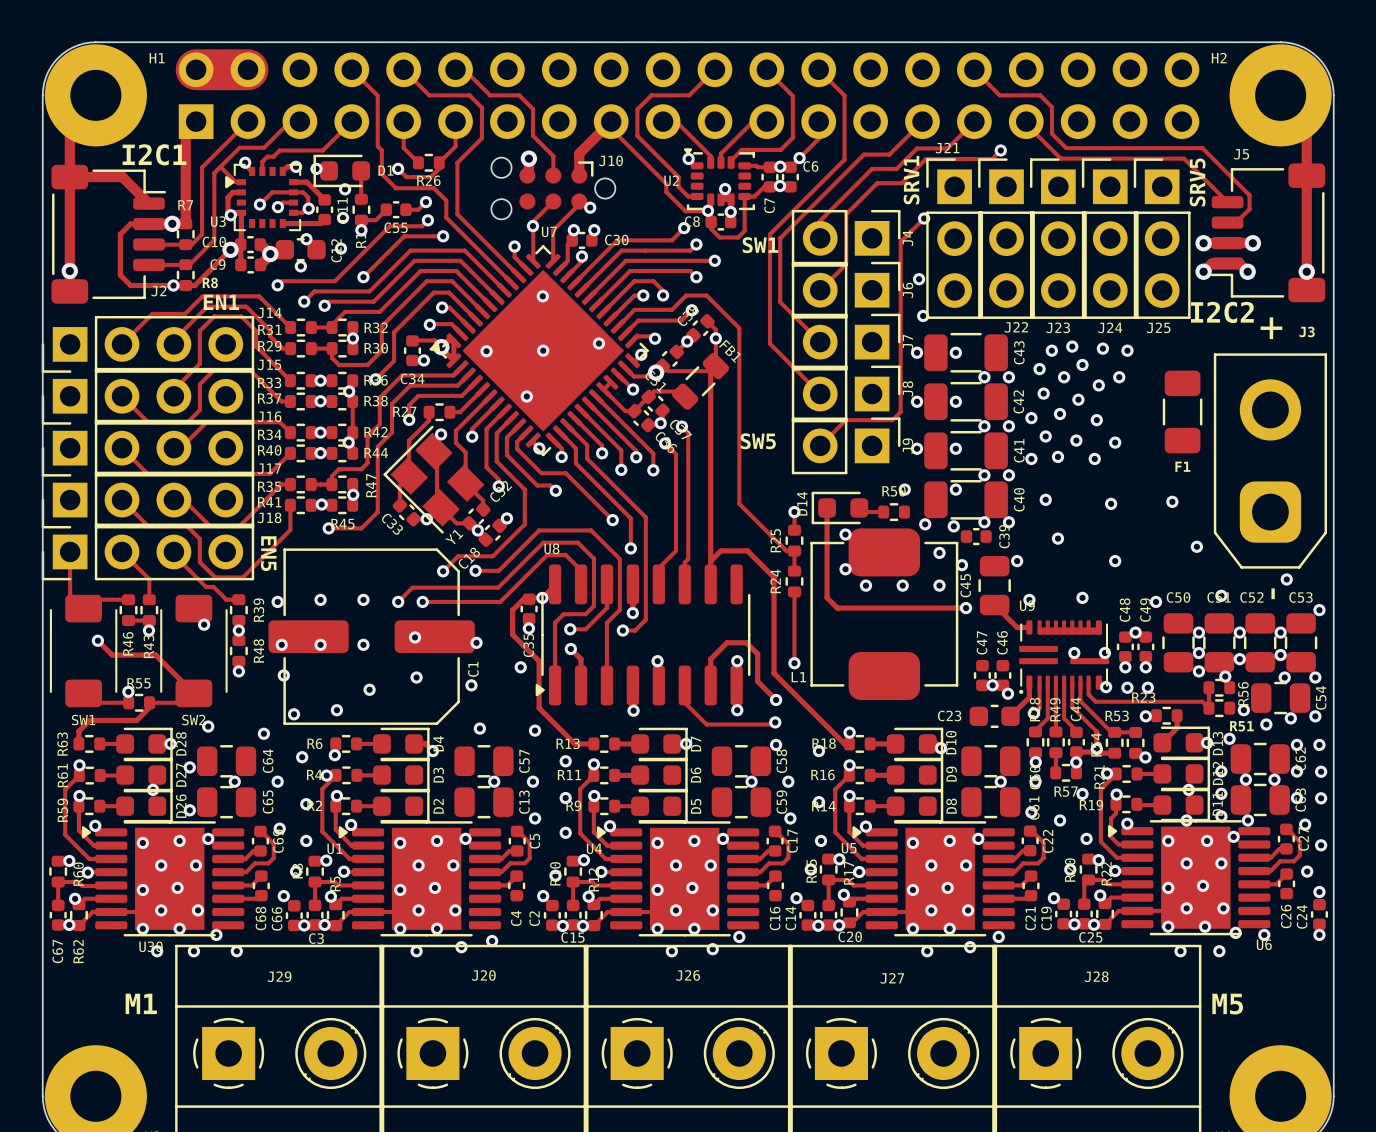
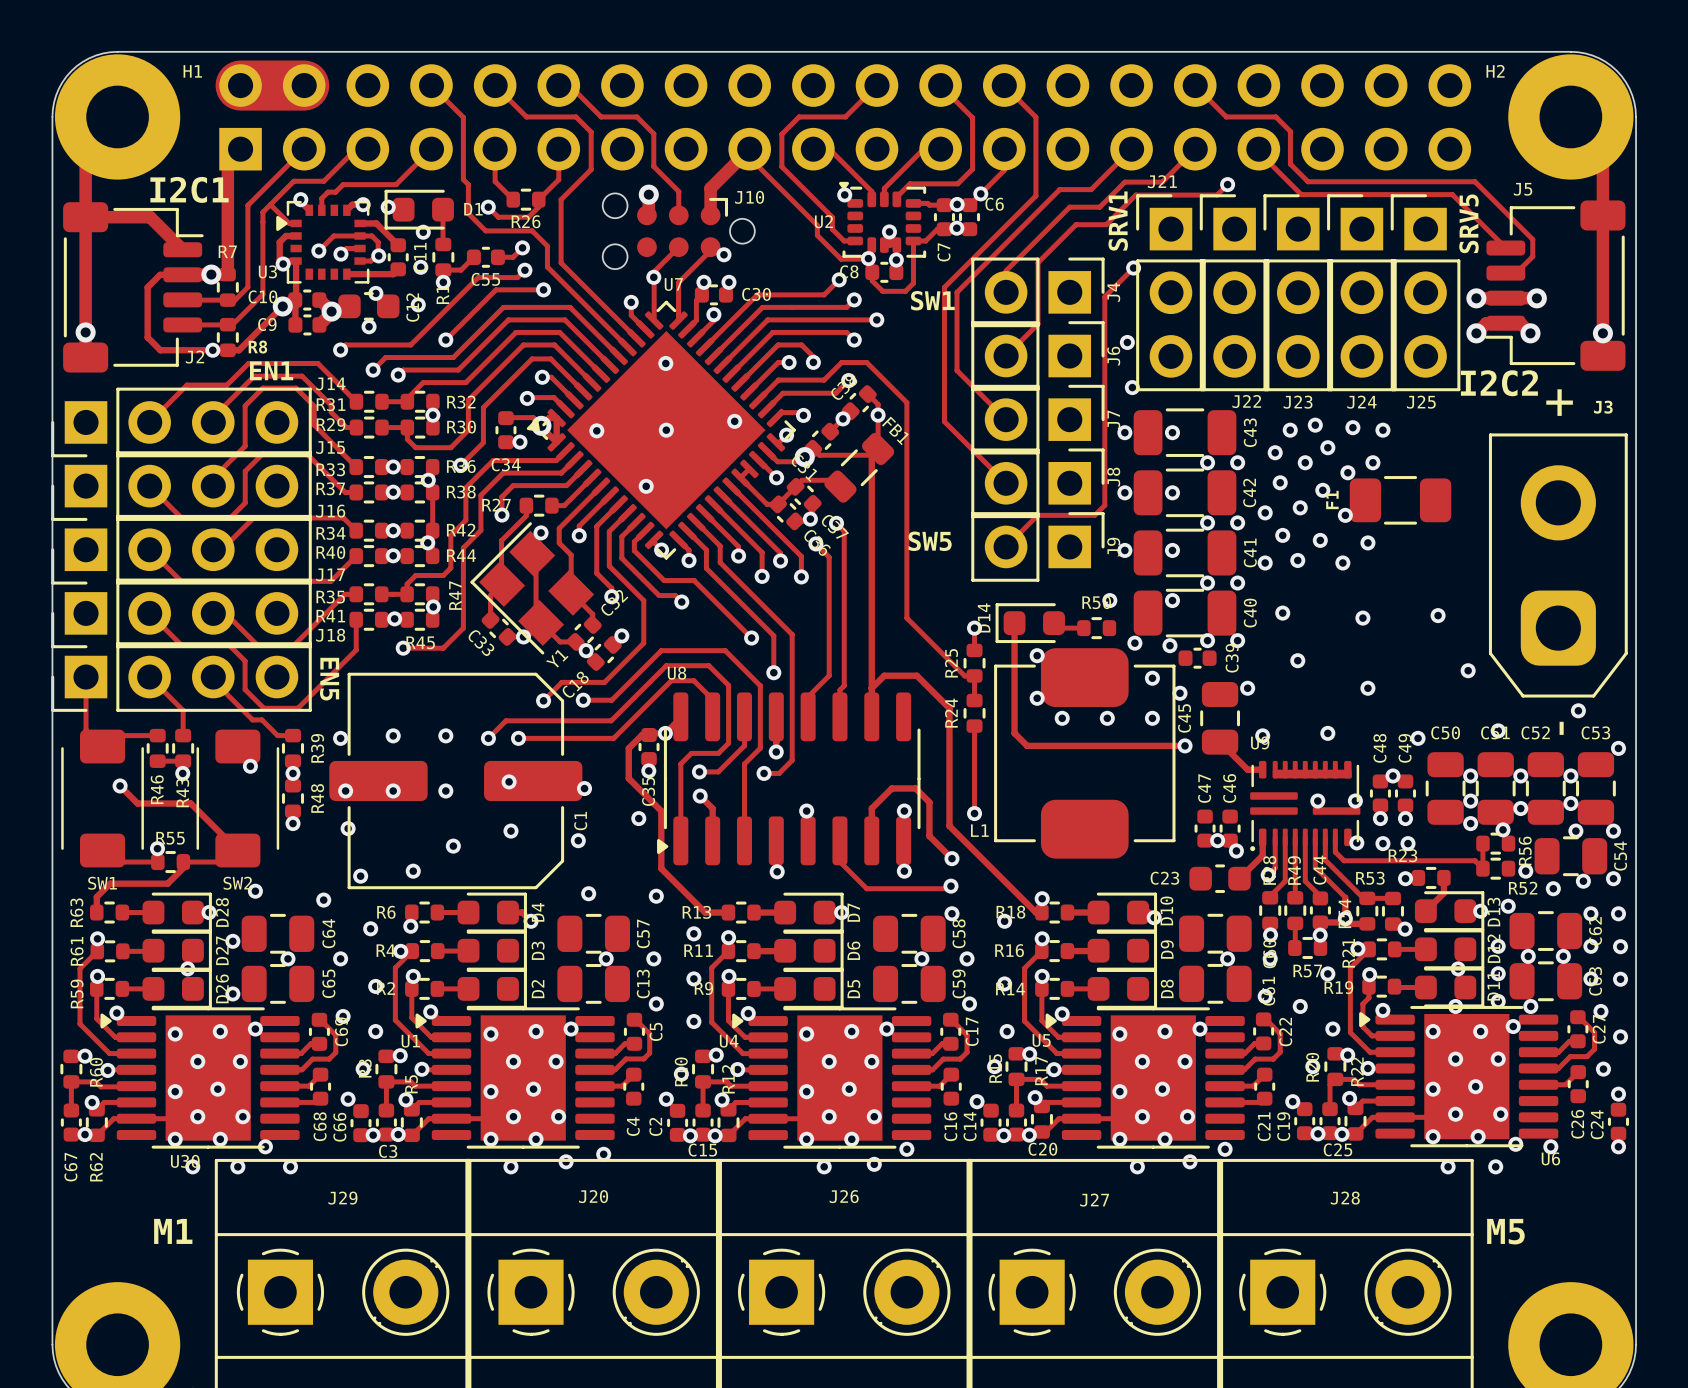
F1 rotation: 0° (1182, 411) -> 90° clockwise (1400, 500)
R51 name: R51 (1241, 726) -> R52 (1523, 888)

